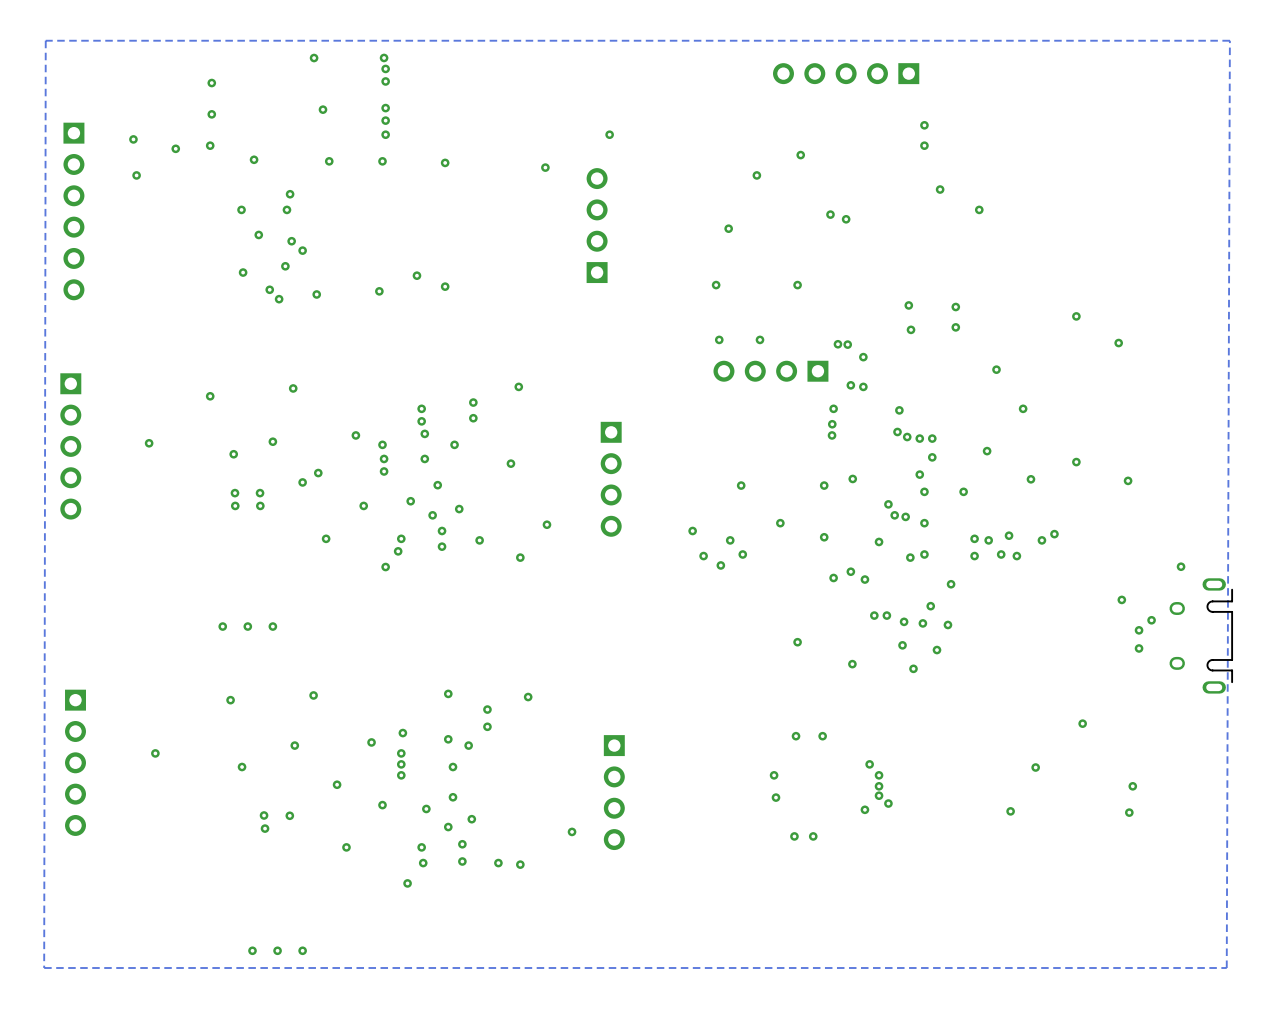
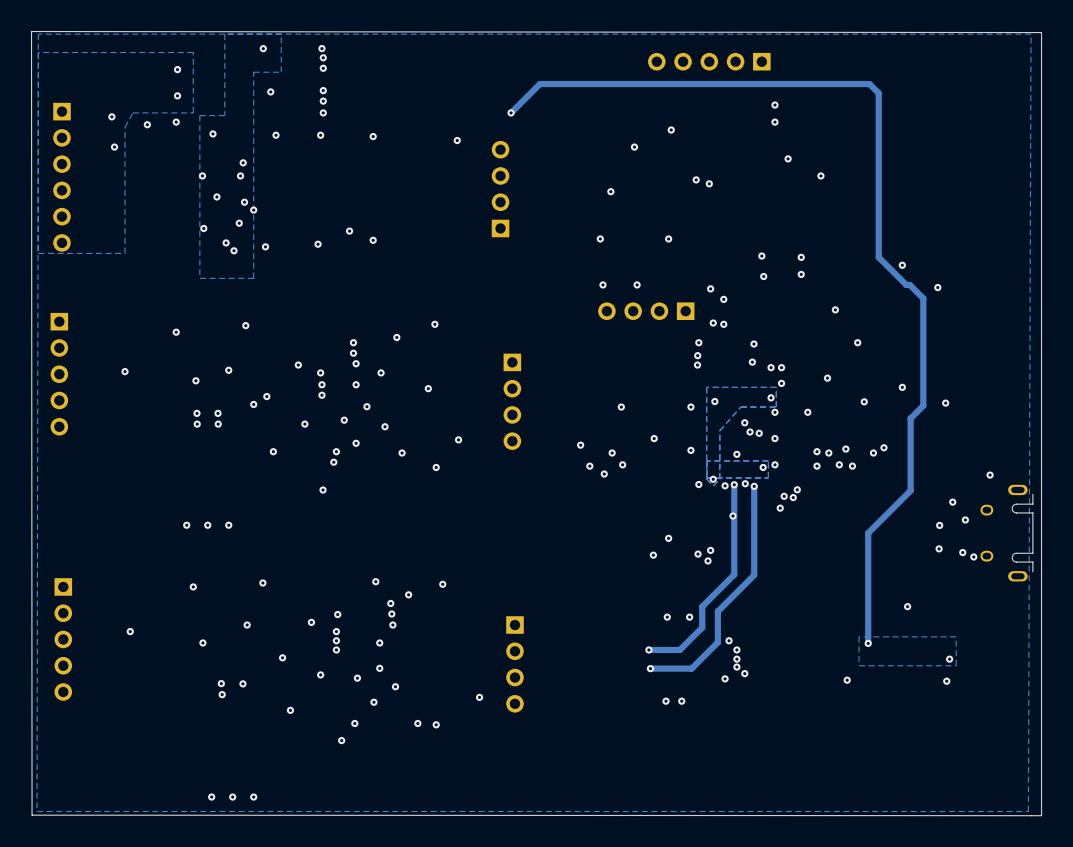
board edge: none -> (31, 31) (1041, 32) (1041, 815) (32, 815) (31, 31)
zone outline: none -> (281, 34) (281, 72) (253, 72) (253, 278) (199, 278) (199, 115) (224, 115) (224, 34)
zone outline: none -> (193, 52) (193, 112) (132, 112) (125, 127) (125, 253) (38, 253) (38, 52) (193, 52)
track: none -> (511, 112) (539, 84) (869, 84) (878, 93) (878, 257) (906, 284) (909, 284) (923, 298) (923, 405) (910, 418) (910, 490) (868, 533) (868, 643)
via: (837, 344) -> none
via: (473, 418) -> none
via: (907, 437) -> none
zone outline: none -> (776, 387) (776, 407) (740, 407) (719, 430) (719, 479) (713, 485) (706, 479) (706, 387) (776, 387)
via: (432, 515) -> none
via: none -> (356, 443)
via: (442, 530) -> none
via: (442, 546) -> none
zone outline: none -> (768, 460) (768, 477) (706, 477) (706, 460) (768, 460)
via position: (385, 567) -> (323, 490)
via: none -> (745, 483)
track: none -> (734, 484) (734, 574) (702, 606) (702, 627) (679, 649) (648, 649)
via: none -> (734, 484)
track: none -> (754, 486) (754, 575) (717, 611) (717, 642) (691, 668) (649, 668)
via: none -> (754, 486)
via: none -> (784, 496)
via: none -> (793, 497)
via: none -> (952, 502)
via: (1121, 599) -> none
via: (886, 615) -> none
via: (904, 621) -> none
via: (922, 623) -> none
via: (947, 624) -> none
via: none -> (939, 525)
via: (1139, 630) -> none
via: (902, 645) -> none
via: (1139, 648) -> none
via: (936, 650) -> none
via: none -> (939, 548)
via: none -> (710, 550)
via: none -> (962, 552)
via: none -> (698, 554)
via: none -> (653, 555)
via: (852, 664) -> none
via: none -> (973, 556)
via: (913, 668) -> none
via: none -> (708, 560)
via: none -> (390, 603)
via: (487, 726) -> none
via: none -> (391, 613)
via: (448, 739) -> none
zone outline: none -> (956, 636) (956, 665) (859, 665) (859, 636) (956, 636)
via: (448, 827) -> none
via: none -> (373, 702)
via: (462, 844) -> none
via: (421, 847) -> none
via: (462, 861) -> none

